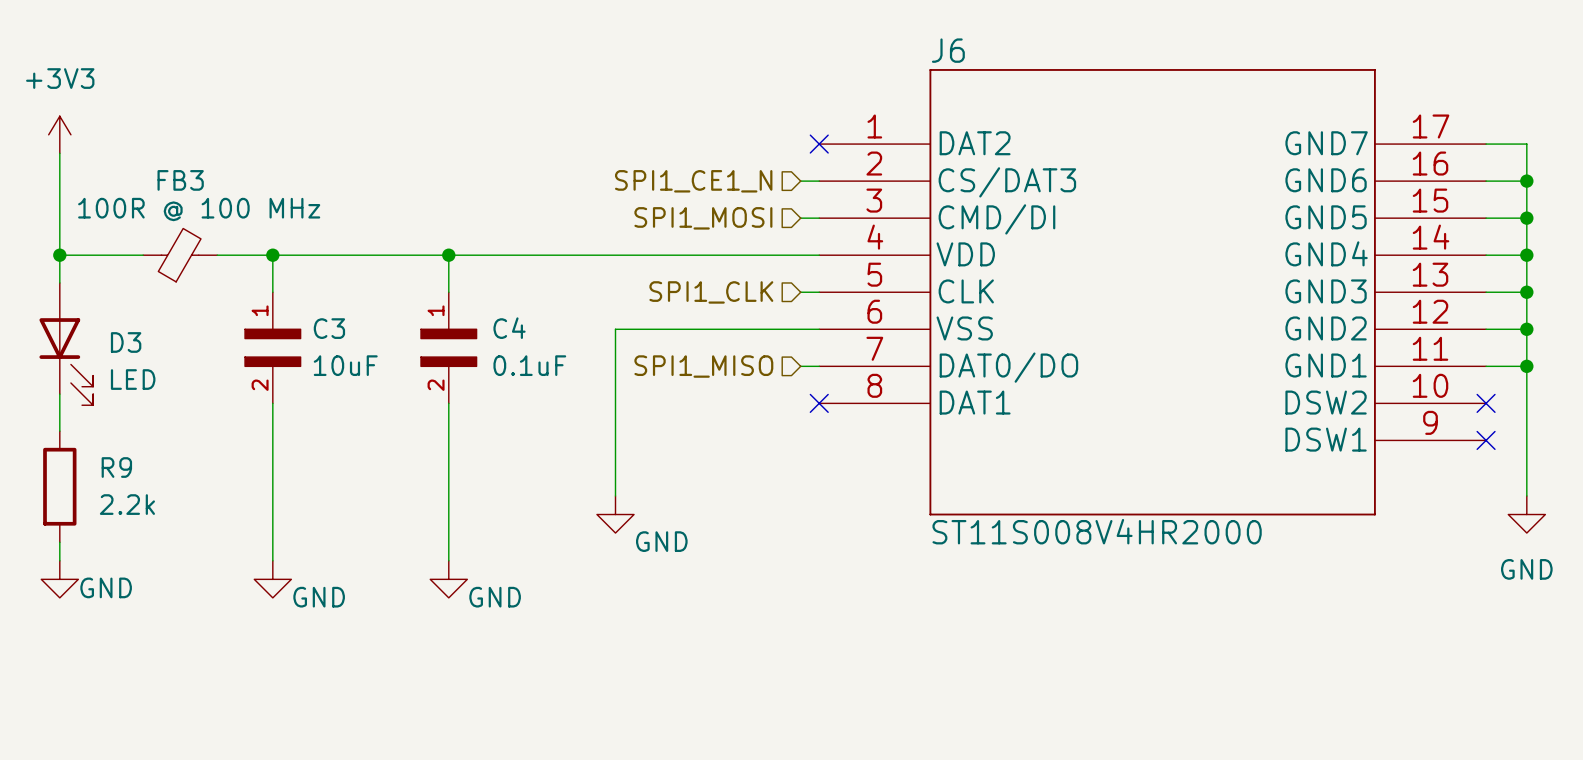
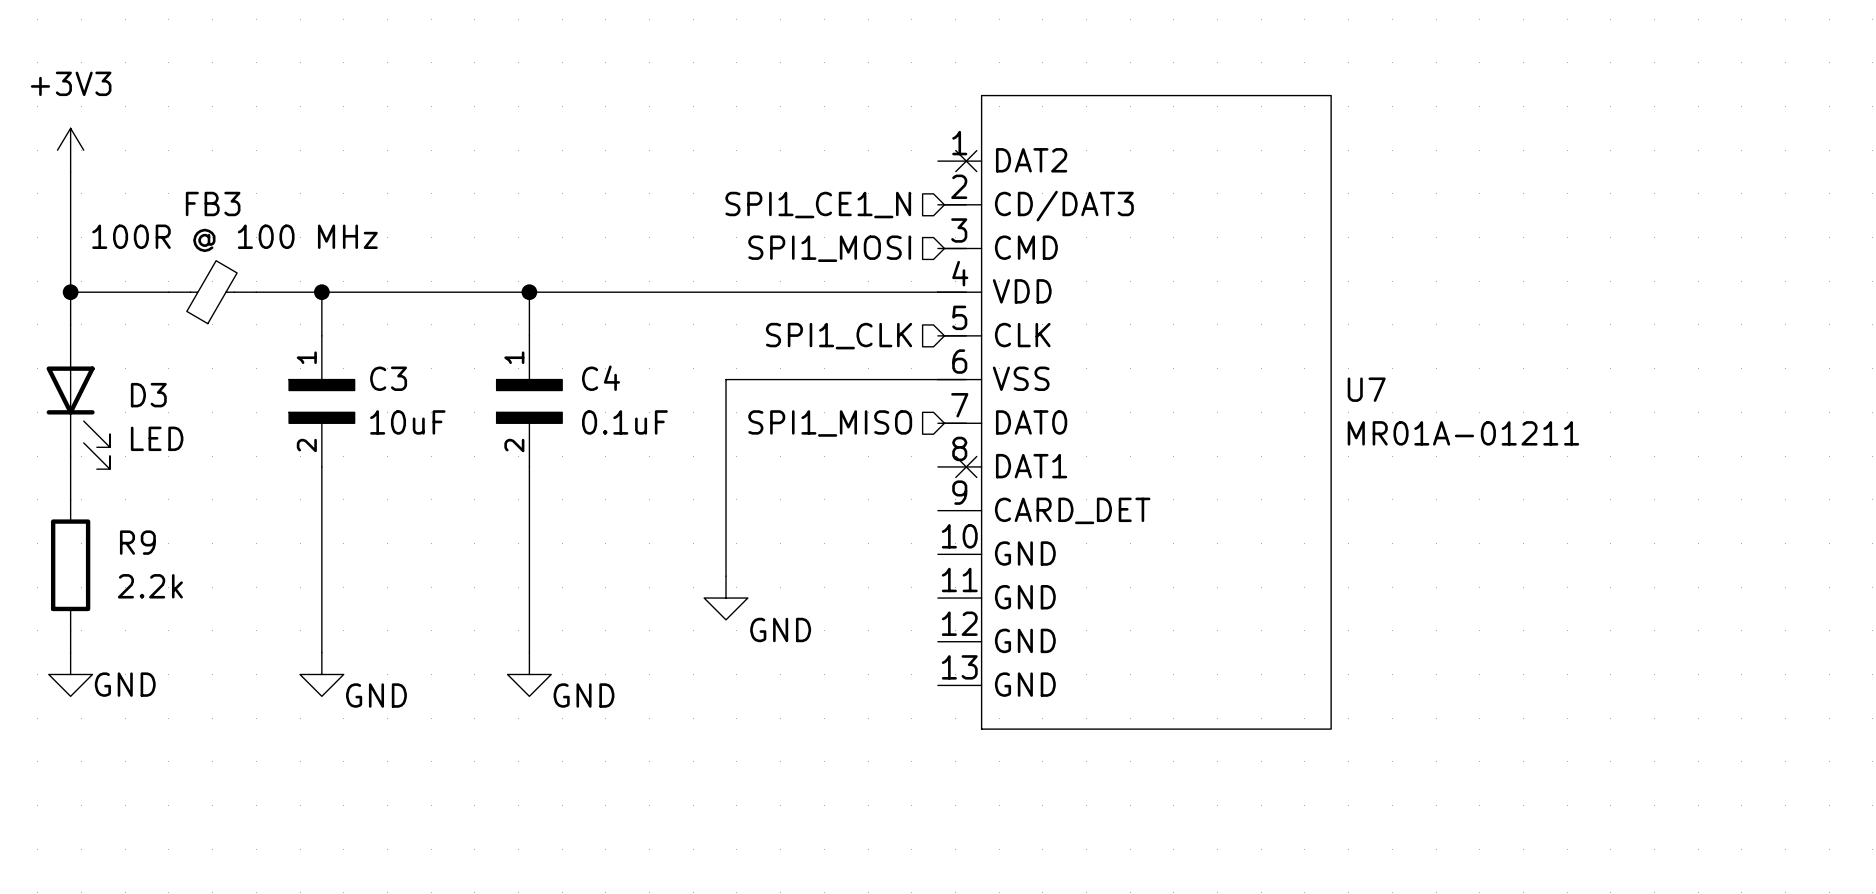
wire: (1486, 144) (1526, 144) (1526, 495) -> none
wire: (1486, 181) (1526, 181) -> none
junction: (1526, 181) -> none
wire: (1486, 218) (1526, 218) -> none
junction: (1526, 218) -> none
wire: (1486, 255) (1526, 255) -> none
junction: (1526, 255) -> none
J6: ST11S008V4HR2000 (1152, 292) -> none
wire: (1486, 292) (1526, 292) -> none
junction: (1526, 292) -> none
wire: (1486, 329) (1526, 329) -> none
junction: (1526, 329) -> none
U7: none -> MR01A-01211 (1134, 412)
wire: (1486, 366) (1526, 366) -> none
junction: (1526, 366) -> none
no-connect mark: (1486, 403) -> none
no-connect mark: (1486, 440) -> none
power symbol: GND (1526, 514) -> none

